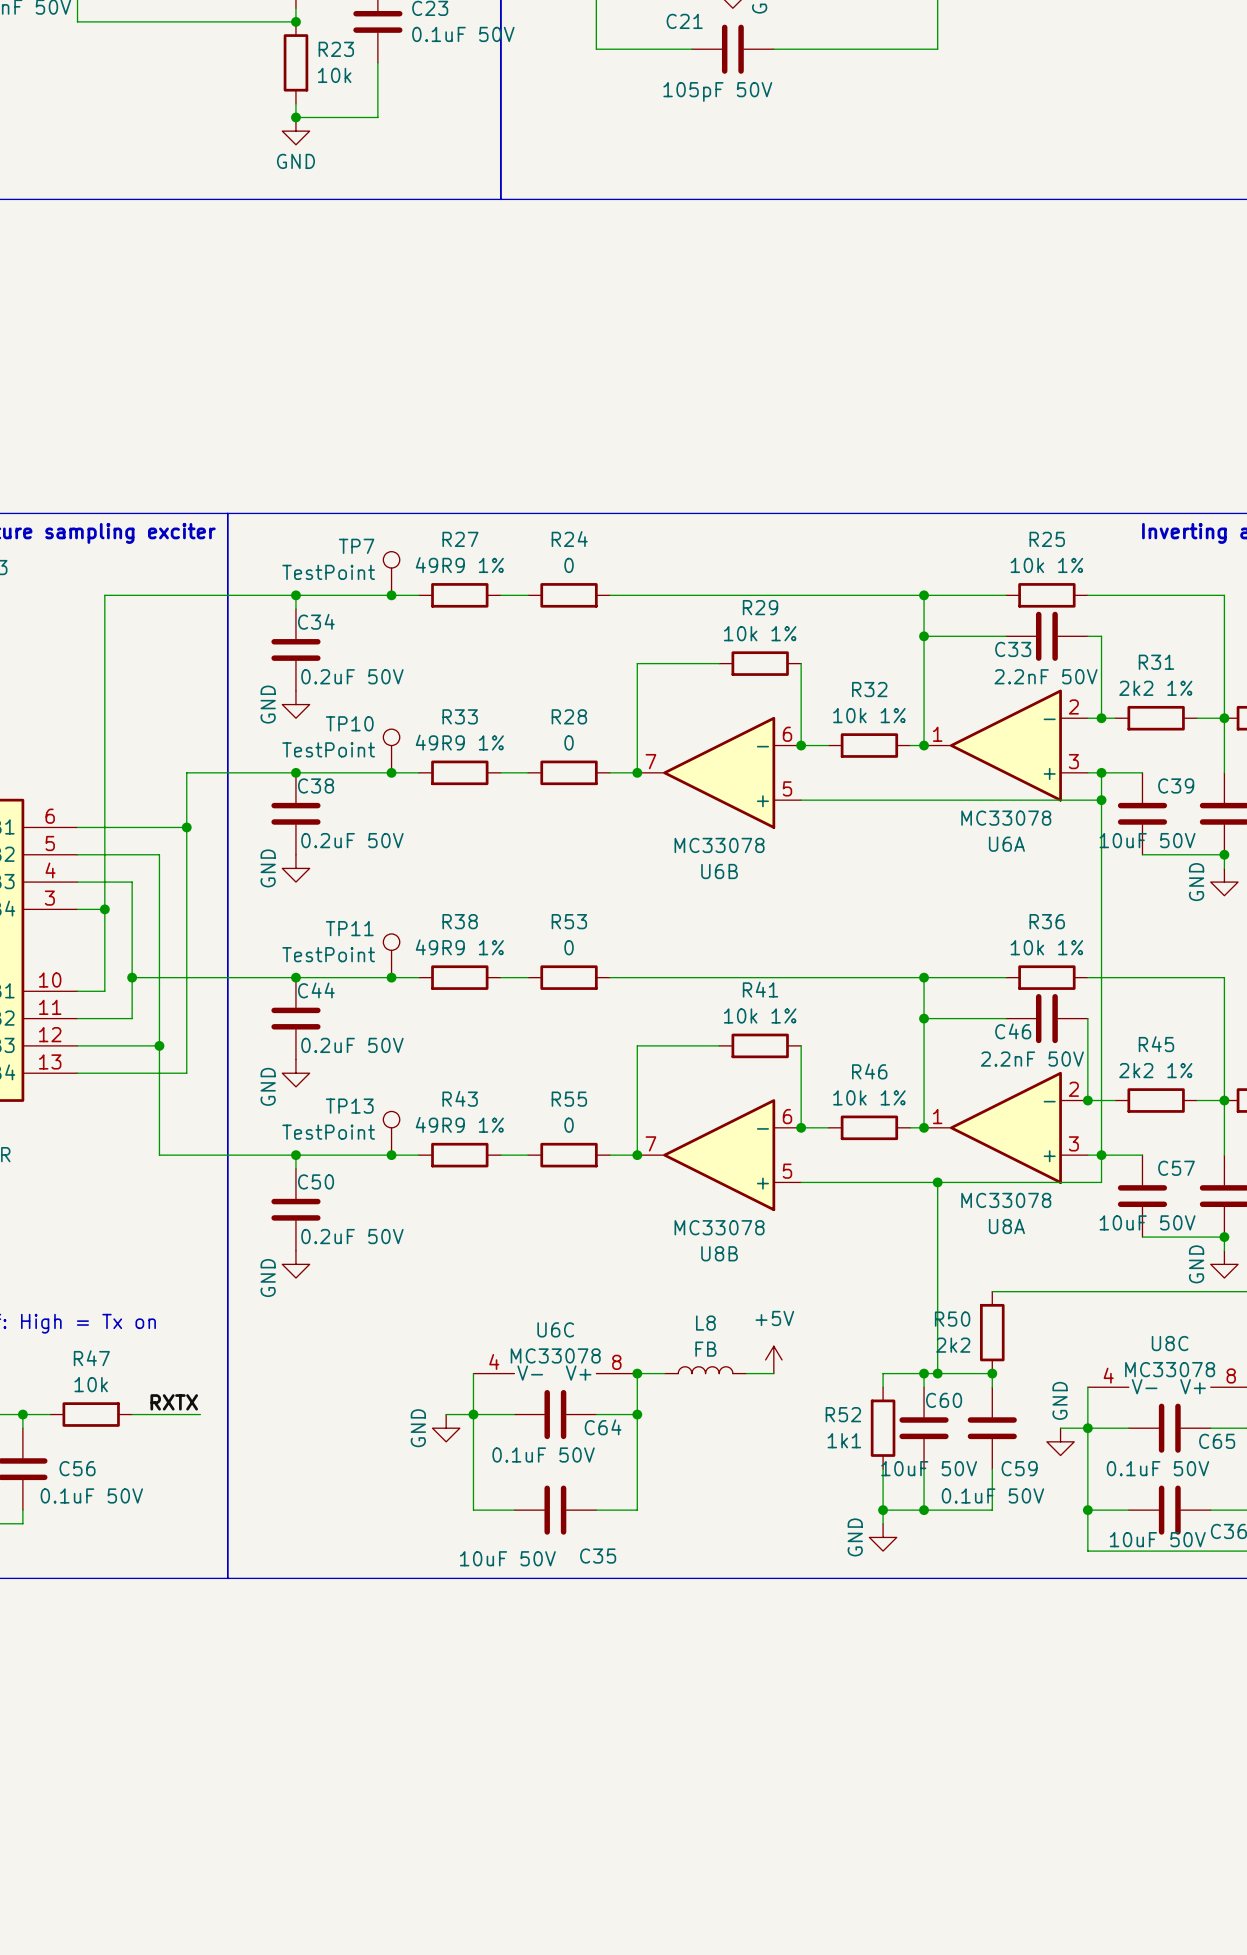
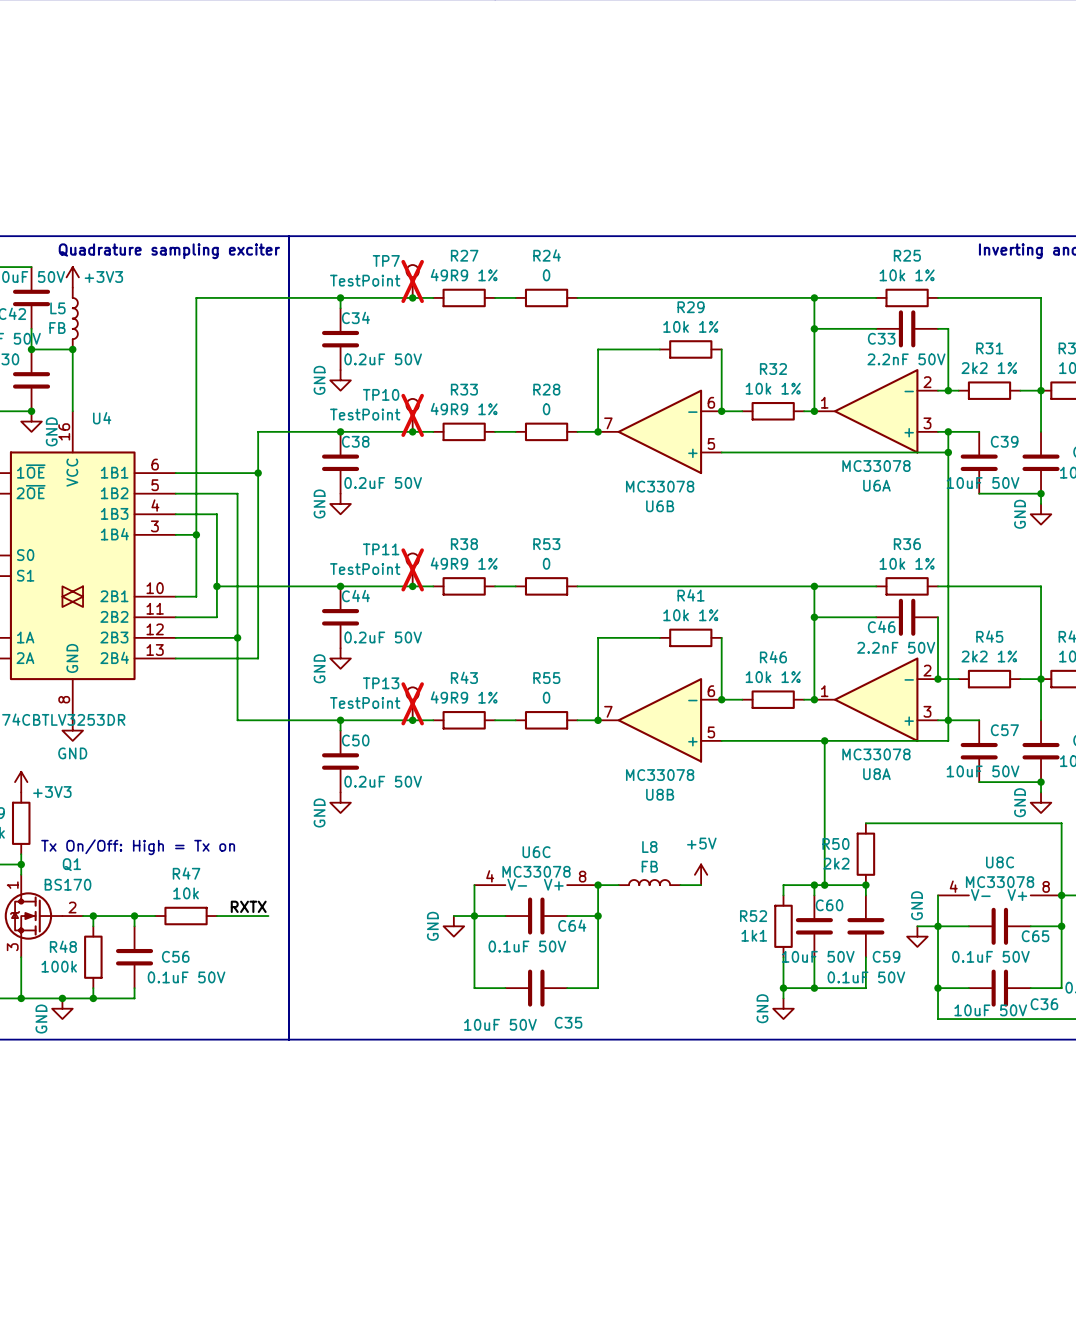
TP7 do-not-place cross: none -> (412, 281)
TP10 do-not-place cross: none -> (412, 415)
TP11 do-not-place cross: none -> (412, 569)
TP13 do-not-place cross: none -> (412, 703)

